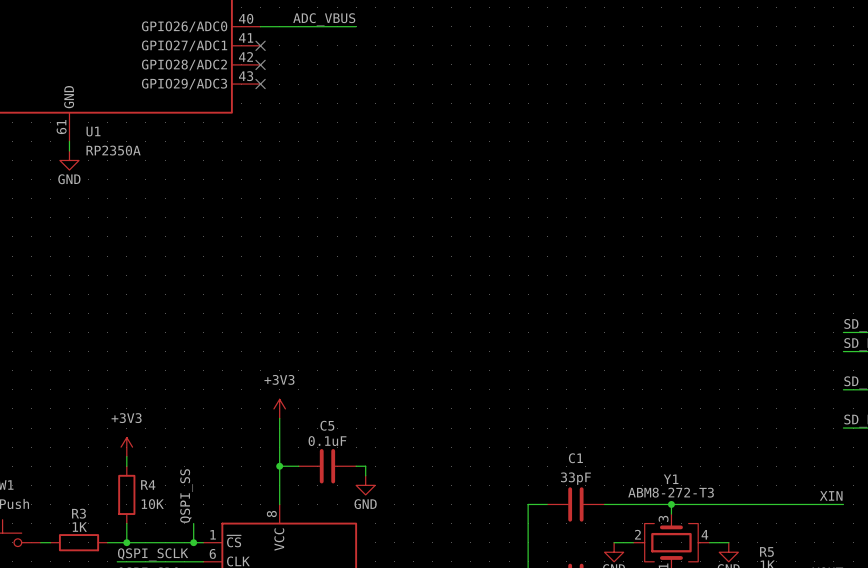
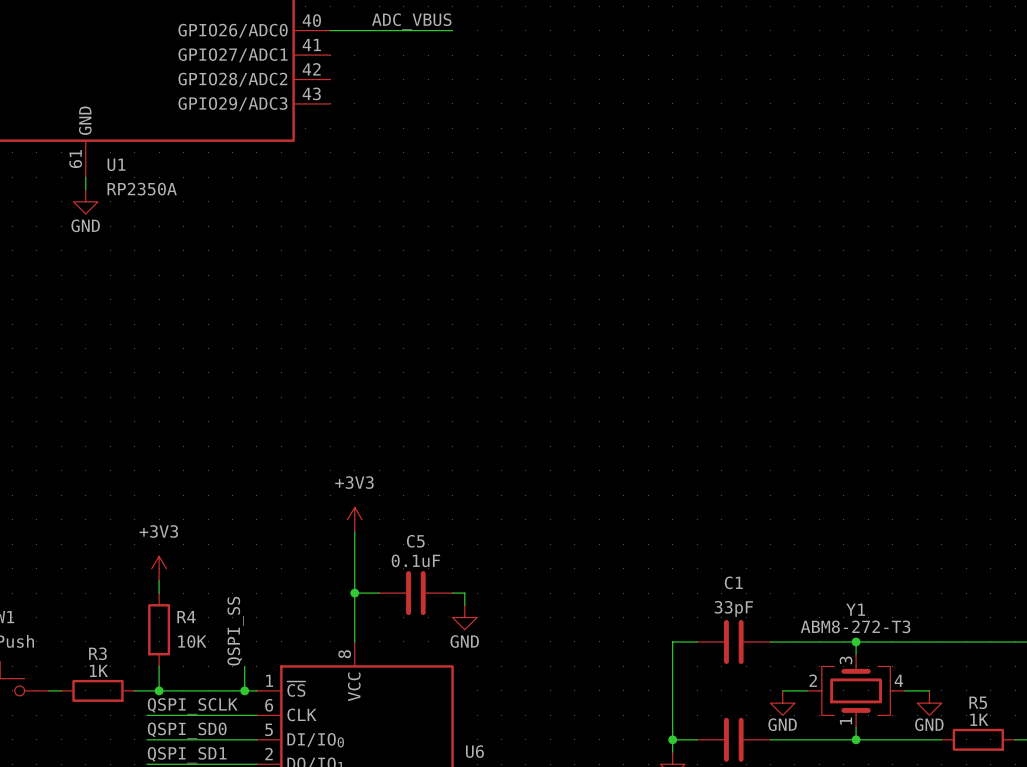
no-connect mark: (260, 45) -> none
no-connect mark: (260, 64) -> none
no-connect mark: (260, 84) -> none

